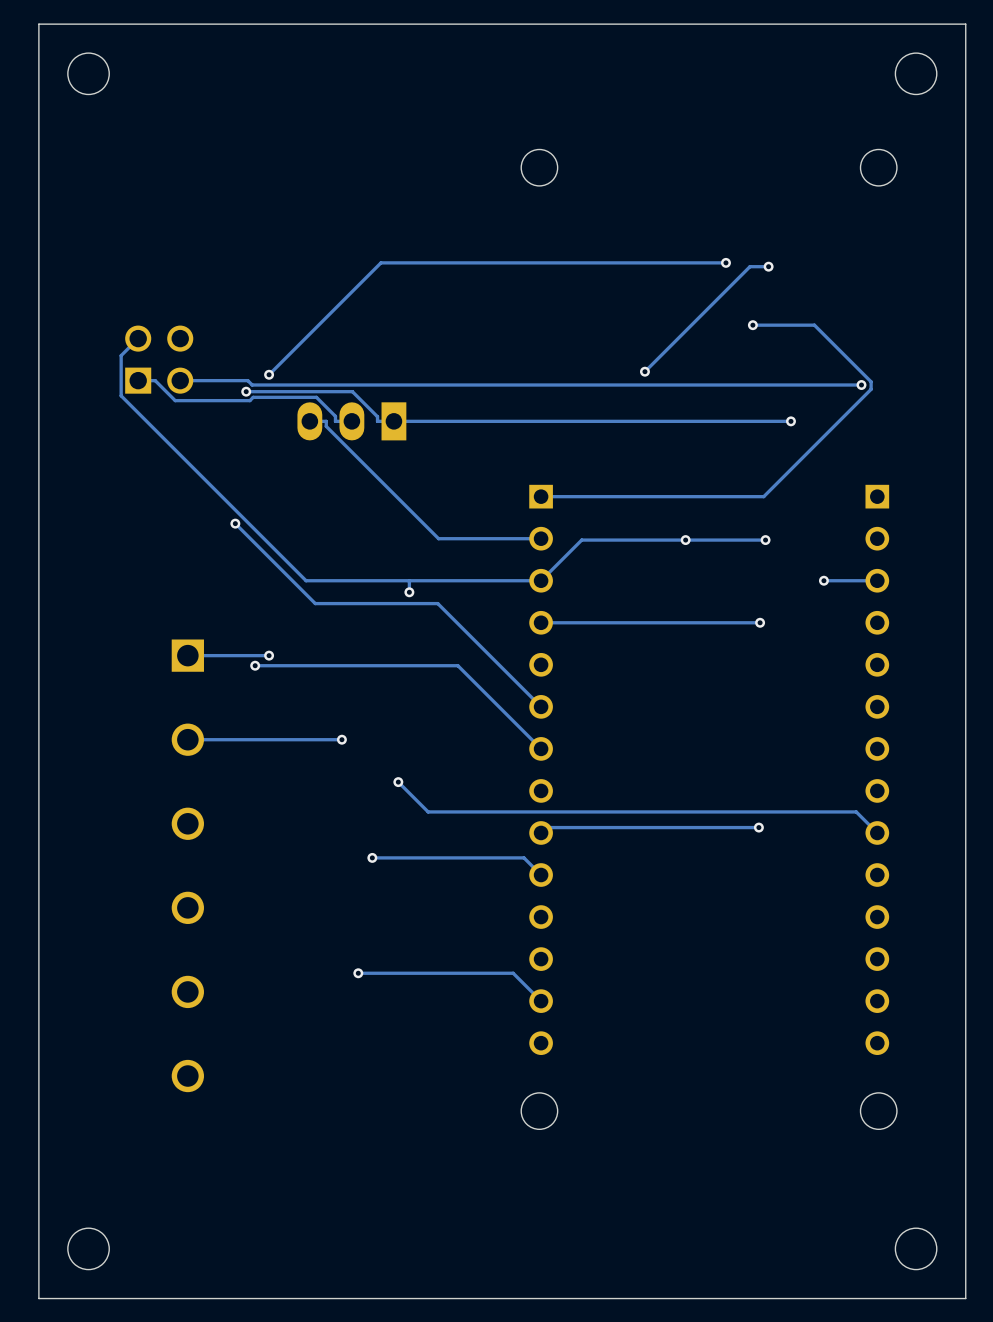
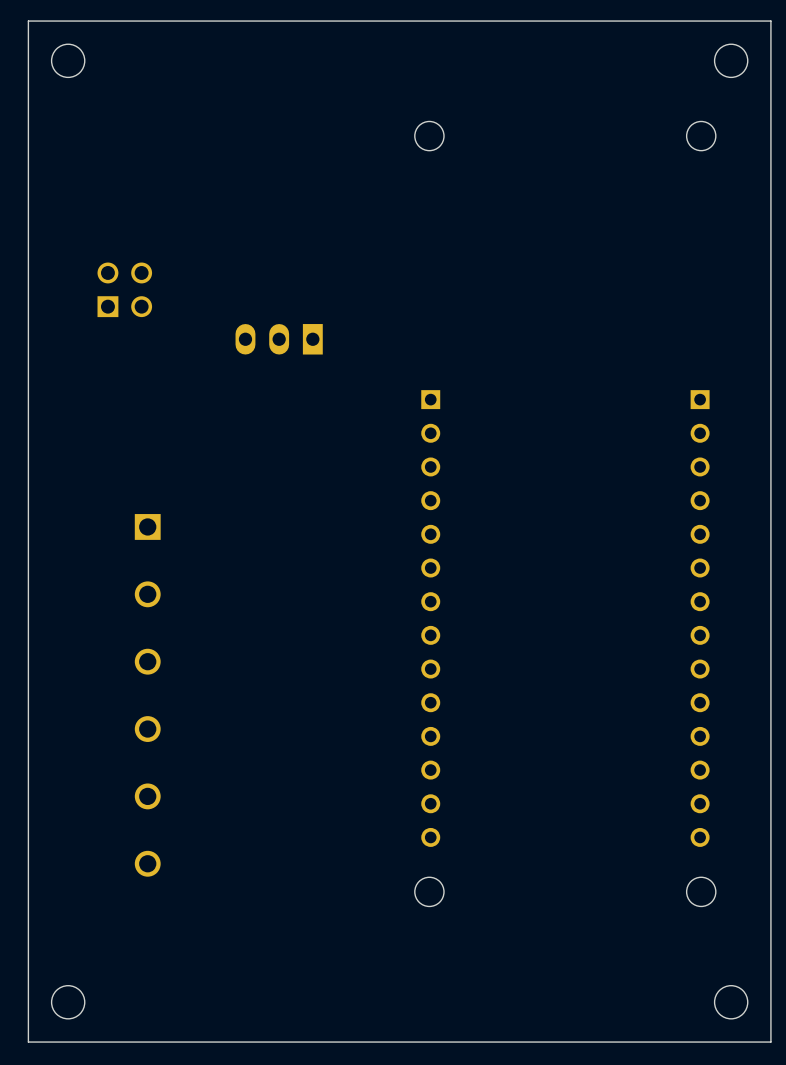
track: (725, 262) (380, 262) (269, 374) -> none
via: (725, 262) -> none
track: (768, 266) (749, 266) (644, 371) -> none
via: (768, 266) -> none
track: (752, 325) (814, 325) (871, 381) (871, 389) (763, 496) (541, 496) -> none
via: (752, 325) -> none
track: (138, 338) (121, 355) (121, 395) (306, 580) (541, 580) (581, 540) (765, 540) -> none
via: (644, 371) -> none
via: (269, 374) -> none
track: (138, 380) (155, 380) (175, 400) (249, 400) (253, 397) (316, 397) (335, 416) (335, 421) (351, 421) -> none
track: (180, 380) (247, 380) (252, 385) (861, 385) -> none
via: (861, 385) -> none
track: (246, 391) (352, 391) (377, 416) (377, 421) (790, 421) -> none
via: (246, 391) -> none
track: (309, 421) (326, 421) (326, 426) (438, 538) (541, 538) -> none
via: (790, 421) -> none
track: (235, 523) (315, 603) (437, 603) (541, 706) -> none
via: (235, 523) -> none
via: (685, 540) -> none
via: (765, 540) -> none
track: (409, 580) (409, 592) -> none
via: (823, 580) -> none
track: (877, 580) (823, 580) -> none
via: (409, 592) -> none
track: (760, 622) (541, 622) -> none
via: (760, 622) -> none
track: (269, 655) (187, 655) -> none
via: (269, 655) -> none
track: (255, 665) (457, 665) (541, 748) -> none
via: (255, 665) -> none
track: (341, 739) (187, 739) -> none
via: (341, 739) -> none
track: (398, 782) (428, 811) (856, 811) (877, 832) -> none
via: (398, 782) -> none
track: (758, 827) (546, 827) (541, 832) -> none
via: (758, 827) -> none
track: (372, 857) (523, 857) (541, 875) -> none
via: (372, 857) -> none
track: (358, 973) (513, 973) (541, 1001) -> none
via: (358, 973) -> none

